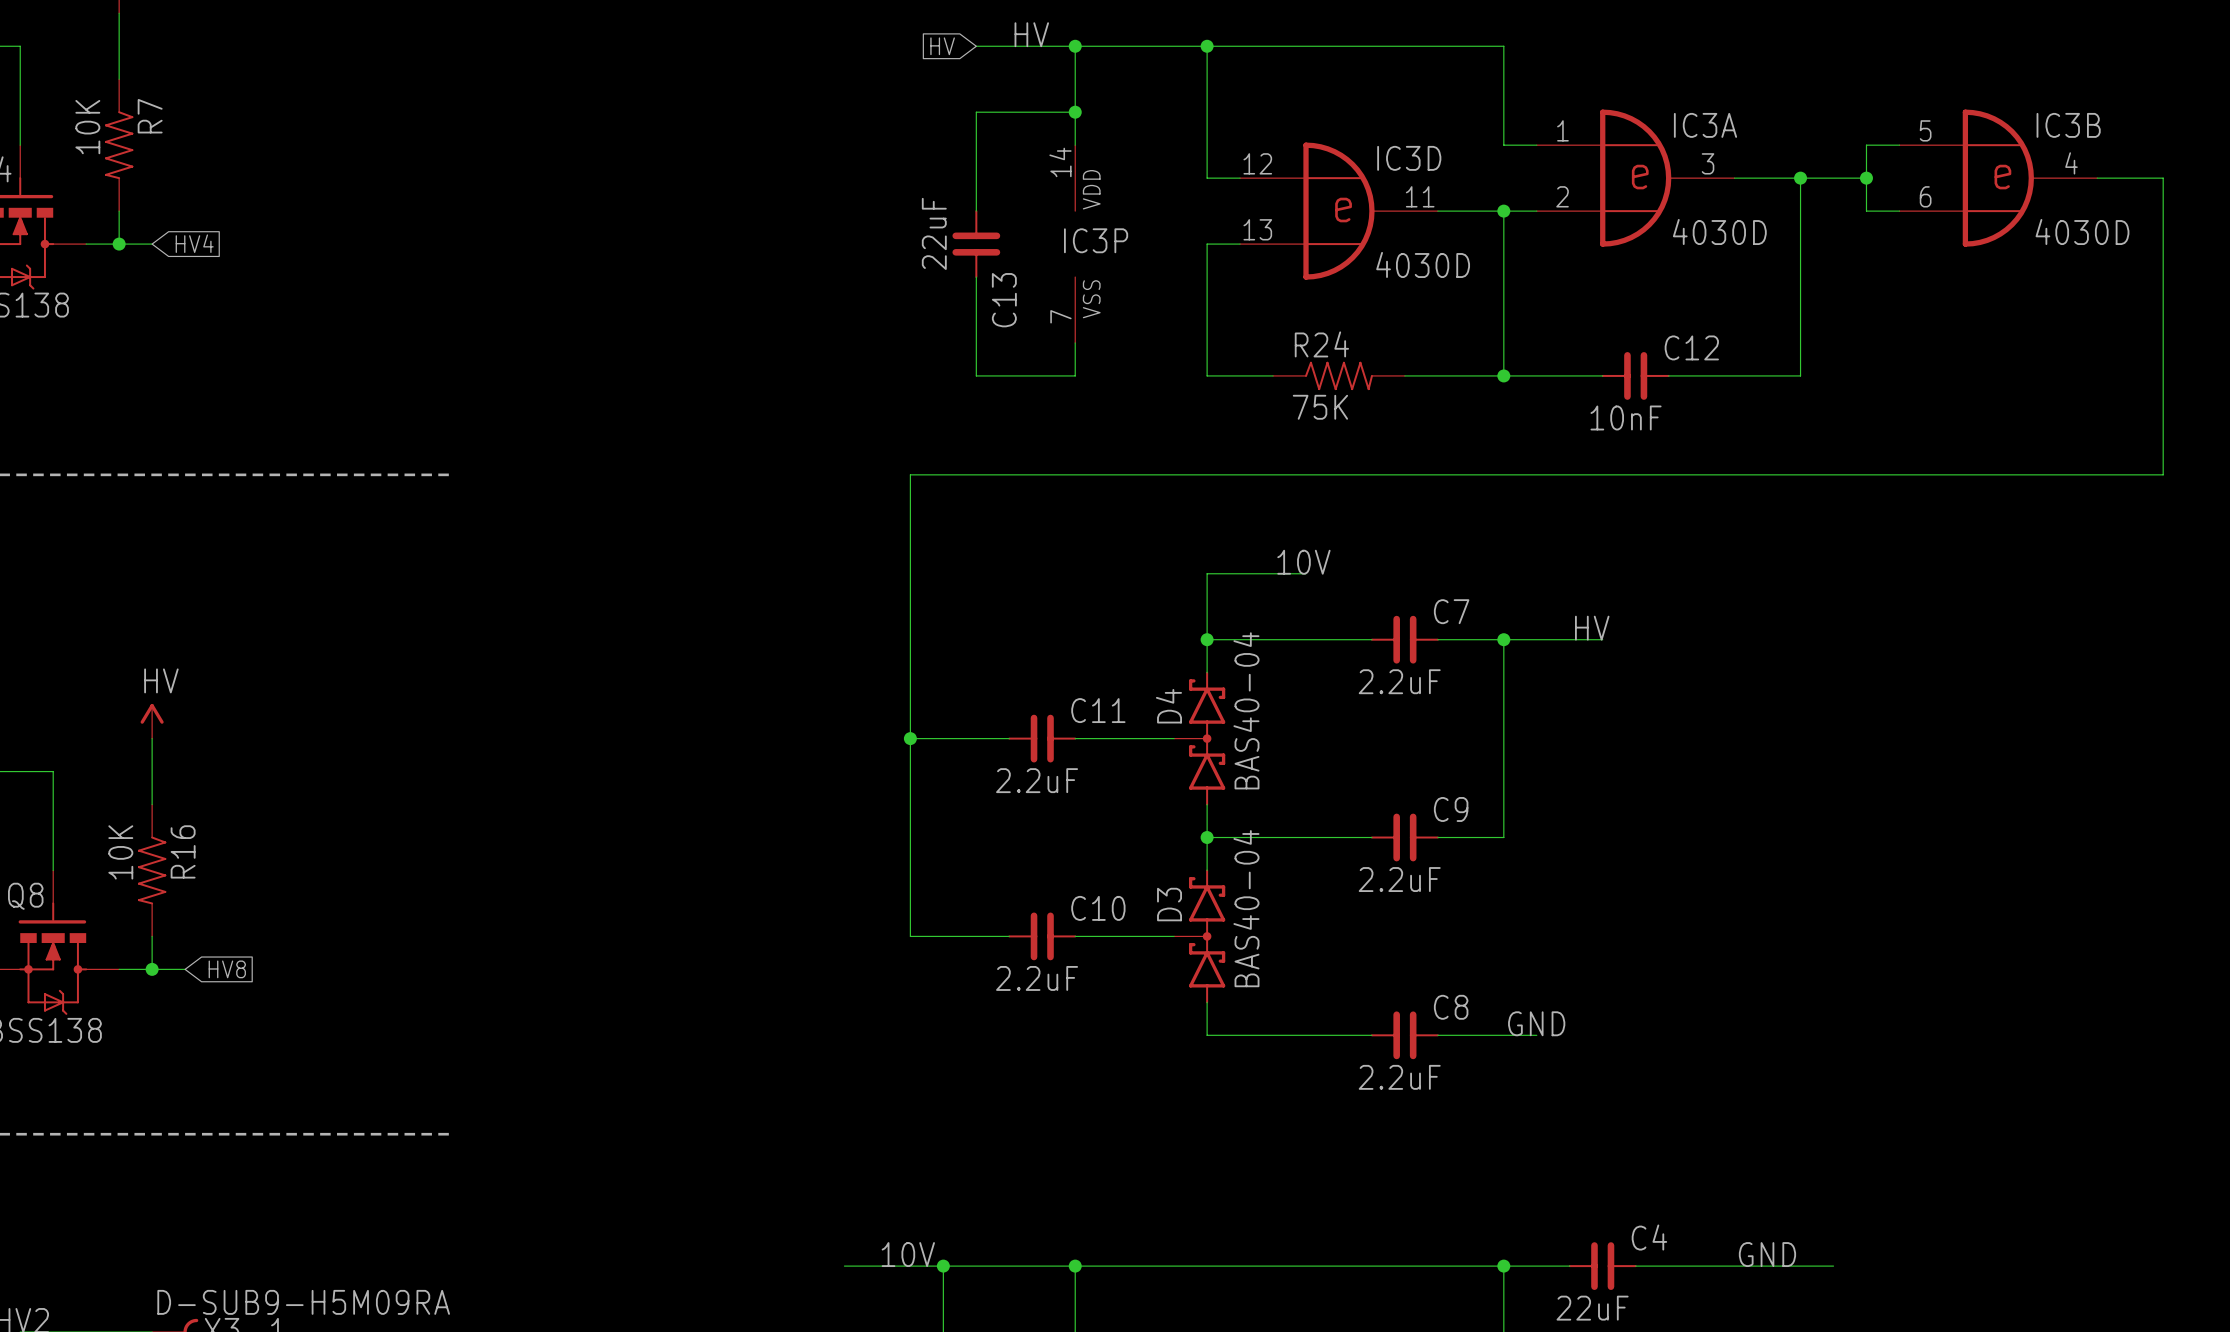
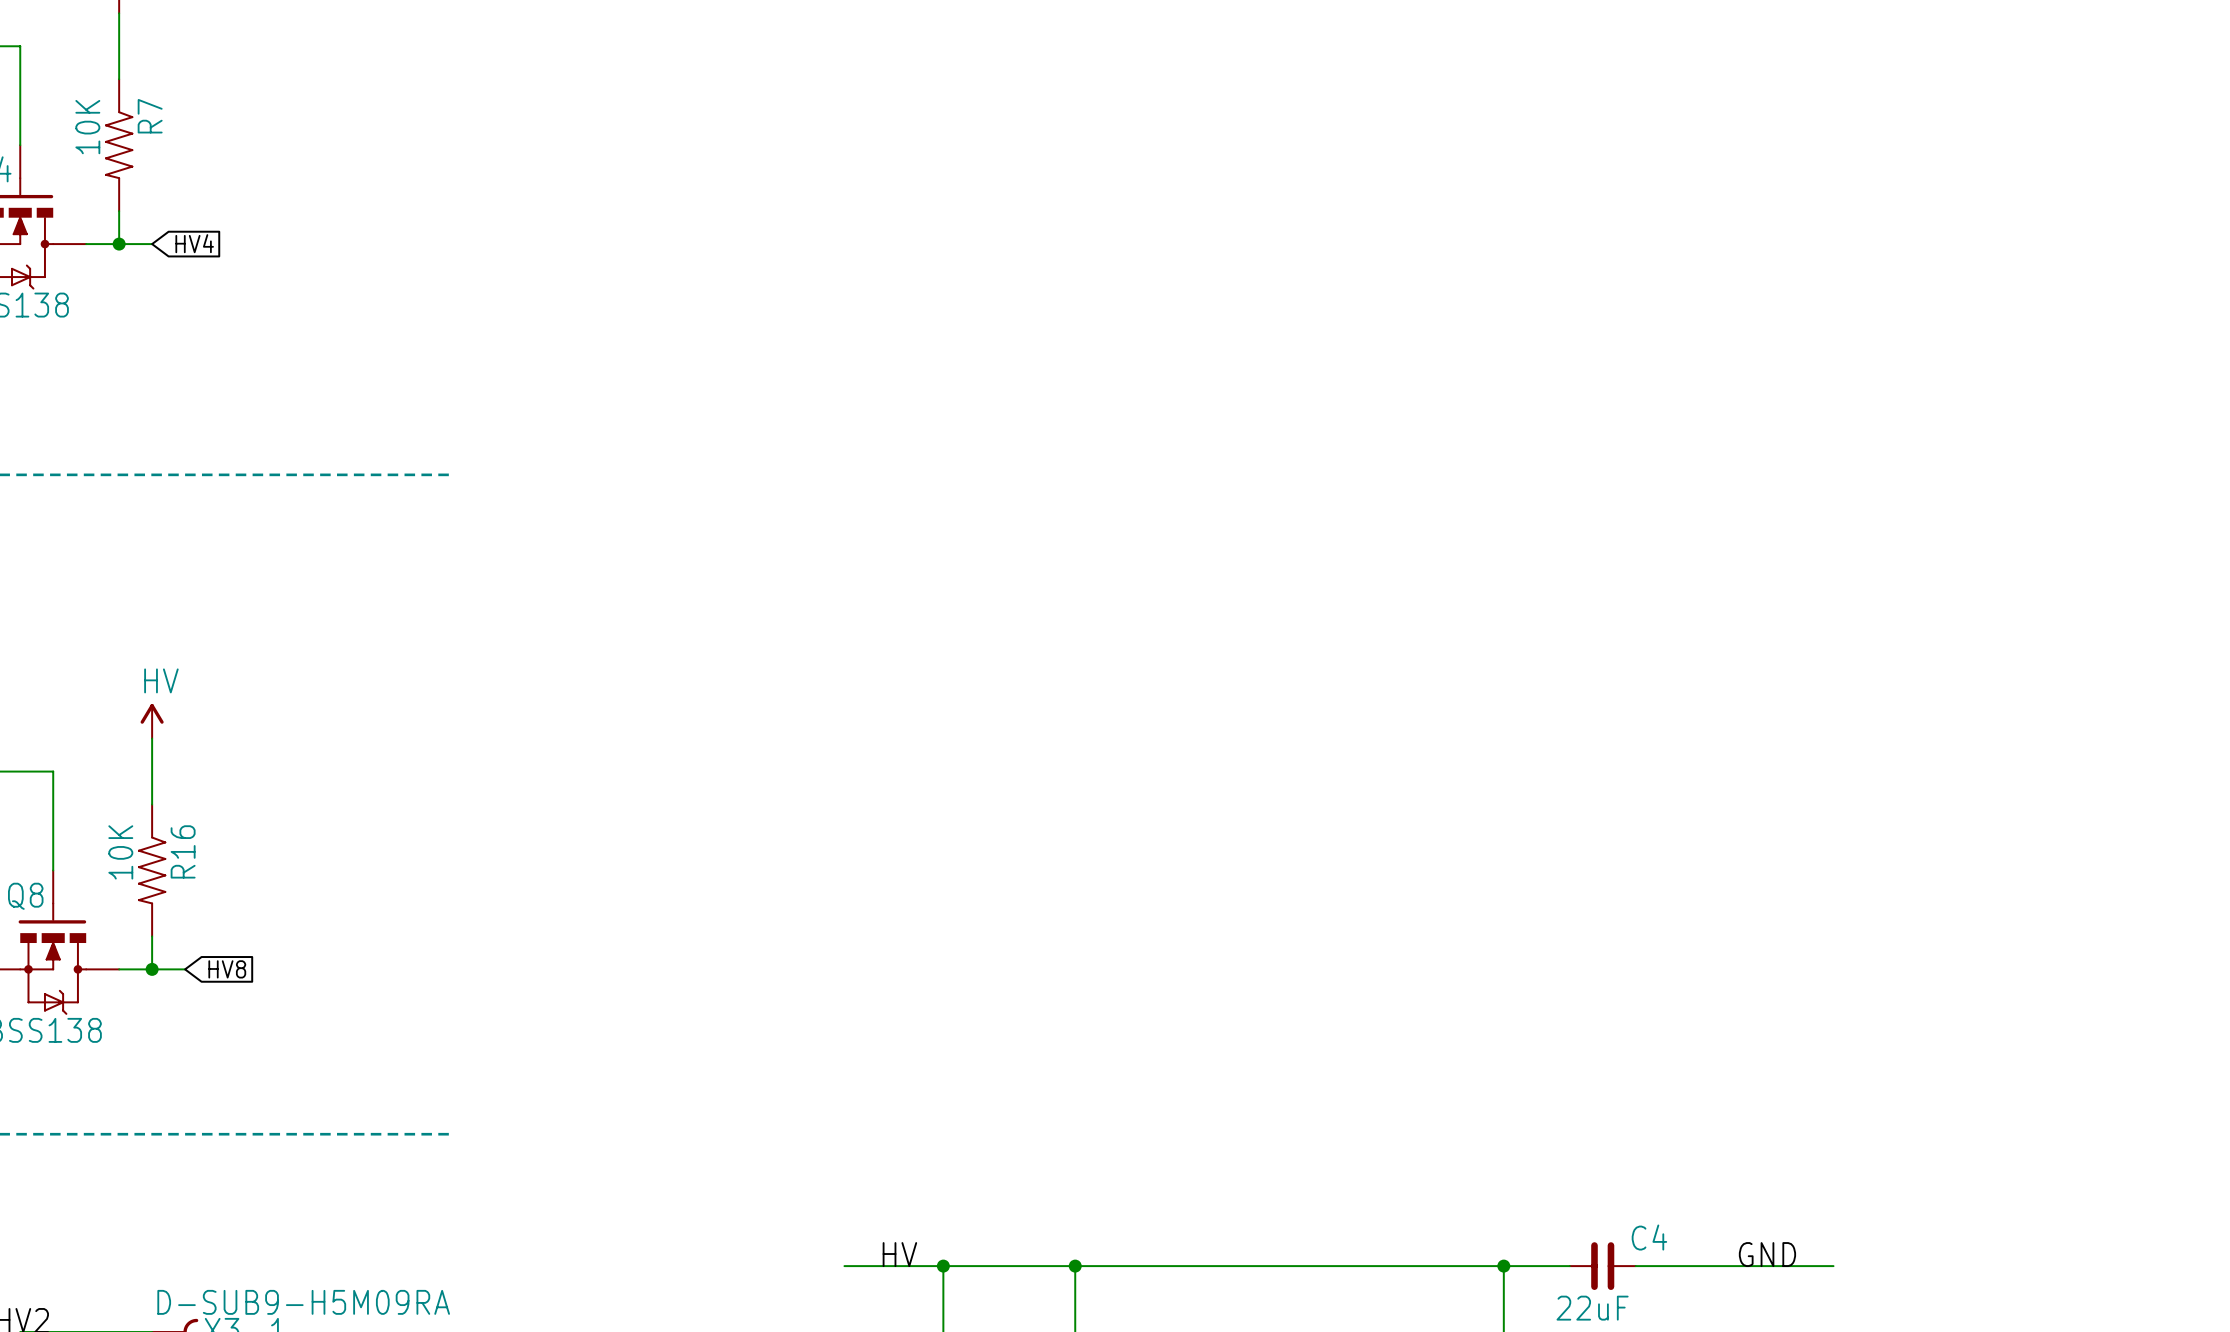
label: HV (1031, 34) -> none
global label: HV (942, 46) -> none
wire: (976, 46) (1503, 46) (1503, 145) (1536, 145) -> none
wire: (1075, 46) (1075, 145) -> none
junction: (1075, 46) -> none
wire: (1207, 46) (1207, 178) (1240, 178) -> none
junction: (1207, 46) -> none
wire: (1075, 112) (976, 112) (976, 211) -> none
junction: (1075, 112) -> none
wire: (1899, 145) (1866, 145) (1866, 211) (1899, 211) -> none
IC3A: 4030D (1635, 178) -> none
wire: (1734, 178) (1866, 178) -> none
wire: (1800, 178) (1800, 375) (1668, 375) -> none
junction: (1800, 178) -> none
junction: (1866, 178) -> none
IC3B: 4030D (1998, 178) -> none
wire: (2097, 178) (2163, 178) (2163, 474) (910, 474) (910, 936) (1009, 936) -> none
IC3D: 4030D (1338, 211) -> none
wire: (1437, 211) (1536, 211) -> none
wire: (1503, 211) (1503, 375) -> none
junction: (1503, 211) -> none
C13: 22uF (976, 244) -> none
IC3P: (1075, 244) -> none
wire: (1240, 244) (1207, 244) (1207, 375) (1273, 375) -> none
wire: (976, 277) (976, 375) (1075, 375) (1075, 342) -> none
R24: 75K (1338, 375) -> none
wire: (1404, 375) (1602, 375) -> none
junction: (1503, 375) -> none
C12: 10nF (1635, 375) -> none
label: 10V (1303, 562) -> none
wire: (1306, 573) (1207, 573) (1207, 672) -> none
label: HV (1592, 628) -> none
wire: (1207, 639) (1371, 639) -> none
junction: (1207, 639) -> none
C7: 2.2uF (1404, 639) -> none
wire: (1437, 639) (1602, 639) -> none
wire: (1503, 639) (1503, 837) (1437, 837) -> none
junction: (1503, 639) -> none
wire: (910, 738) (1009, 738) -> none
junction: (910, 738) -> none
C11: 2.2uF (1042, 738) -> none
wire: (1075, 738) (1174, 738) -> none
D4: BAS40-04 (1199, 738) -> none
wire: (1207, 804) (1207, 870) -> none
wire: (1207, 837) (1371, 837) -> none
junction: (1207, 837) -> none
C9: 2.2uF (1404, 837) -> none
C10: 2.2uF (1042, 936) -> none
wire: (1075, 936) (1174, 936) -> none
D3: BAS40-04 (1199, 936) -> none
wire: (1207, 1002) (1207, 1035) (1371, 1035) -> none
label: GND (1536, 1023) -> none
C8: 2.2uF (1404, 1035) -> none
wire: (1437, 1035) (1536, 1035) -> none
label: 10V (908, 1254) -> HV (899, 1254)

